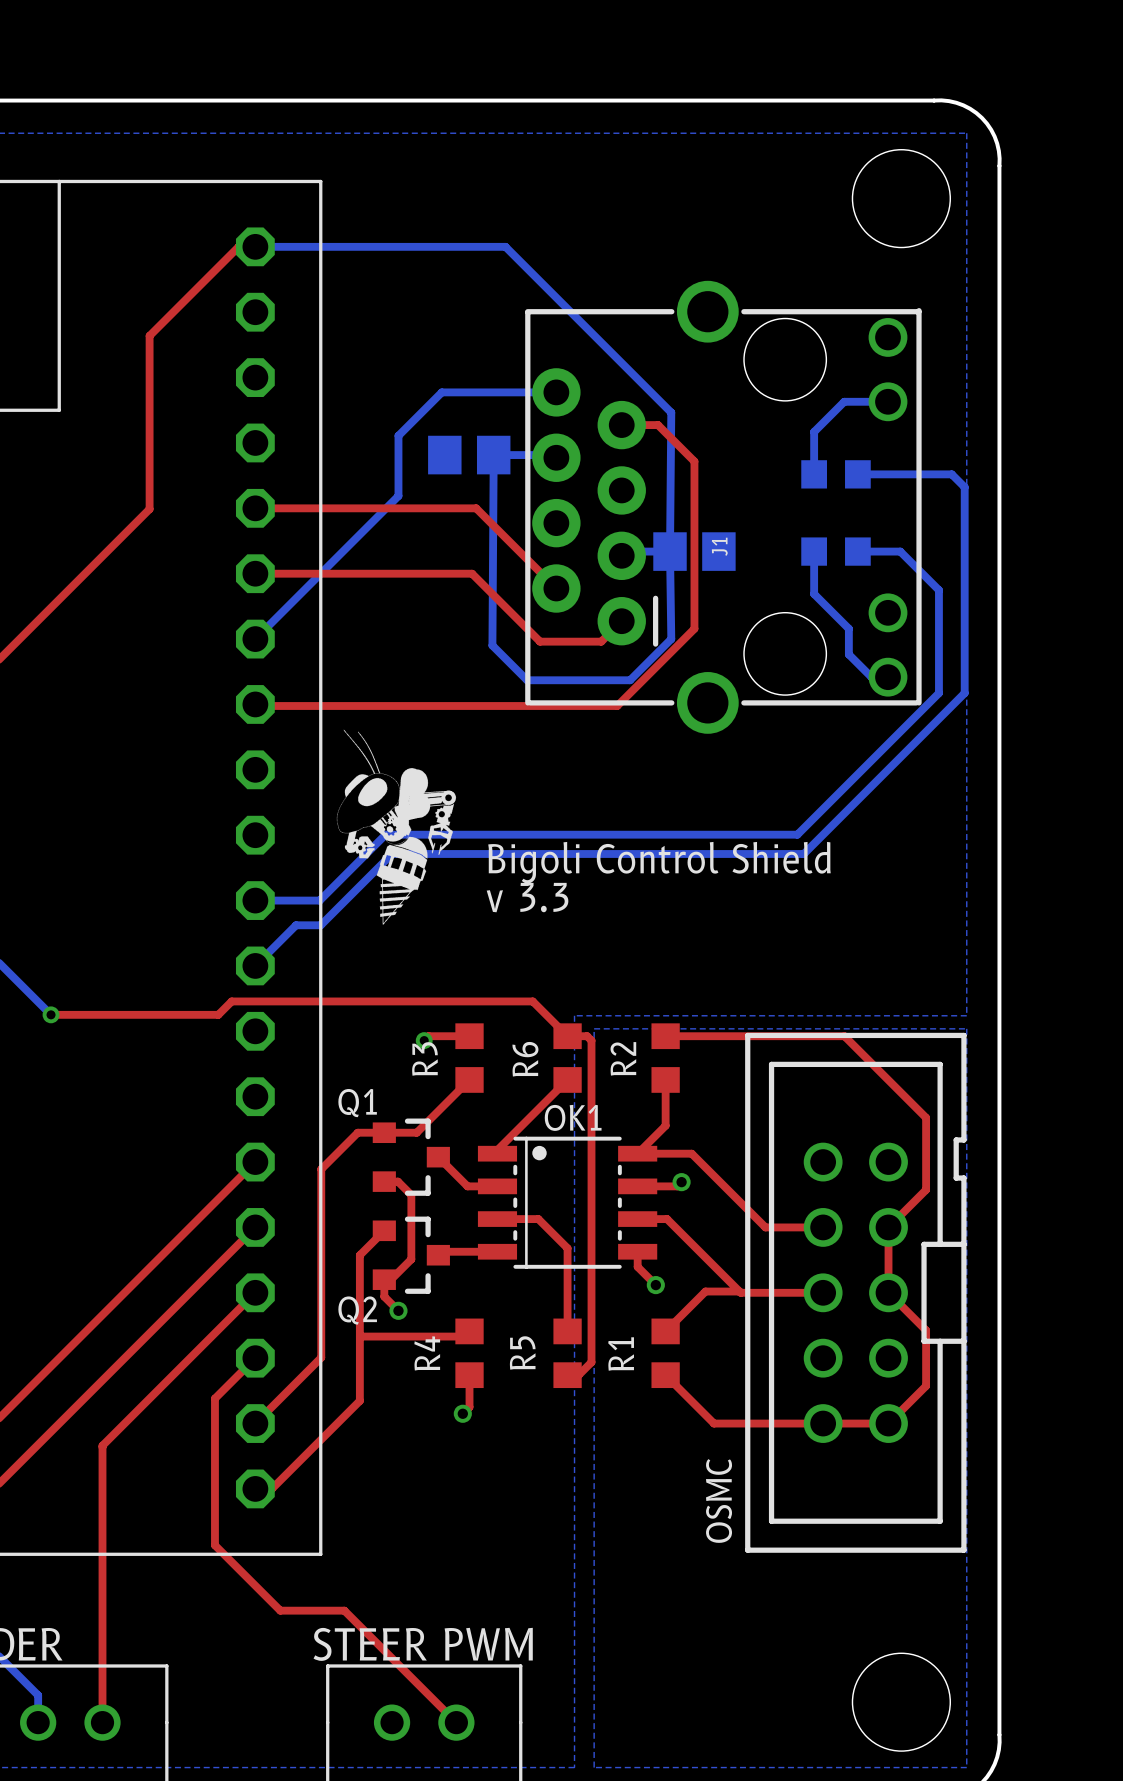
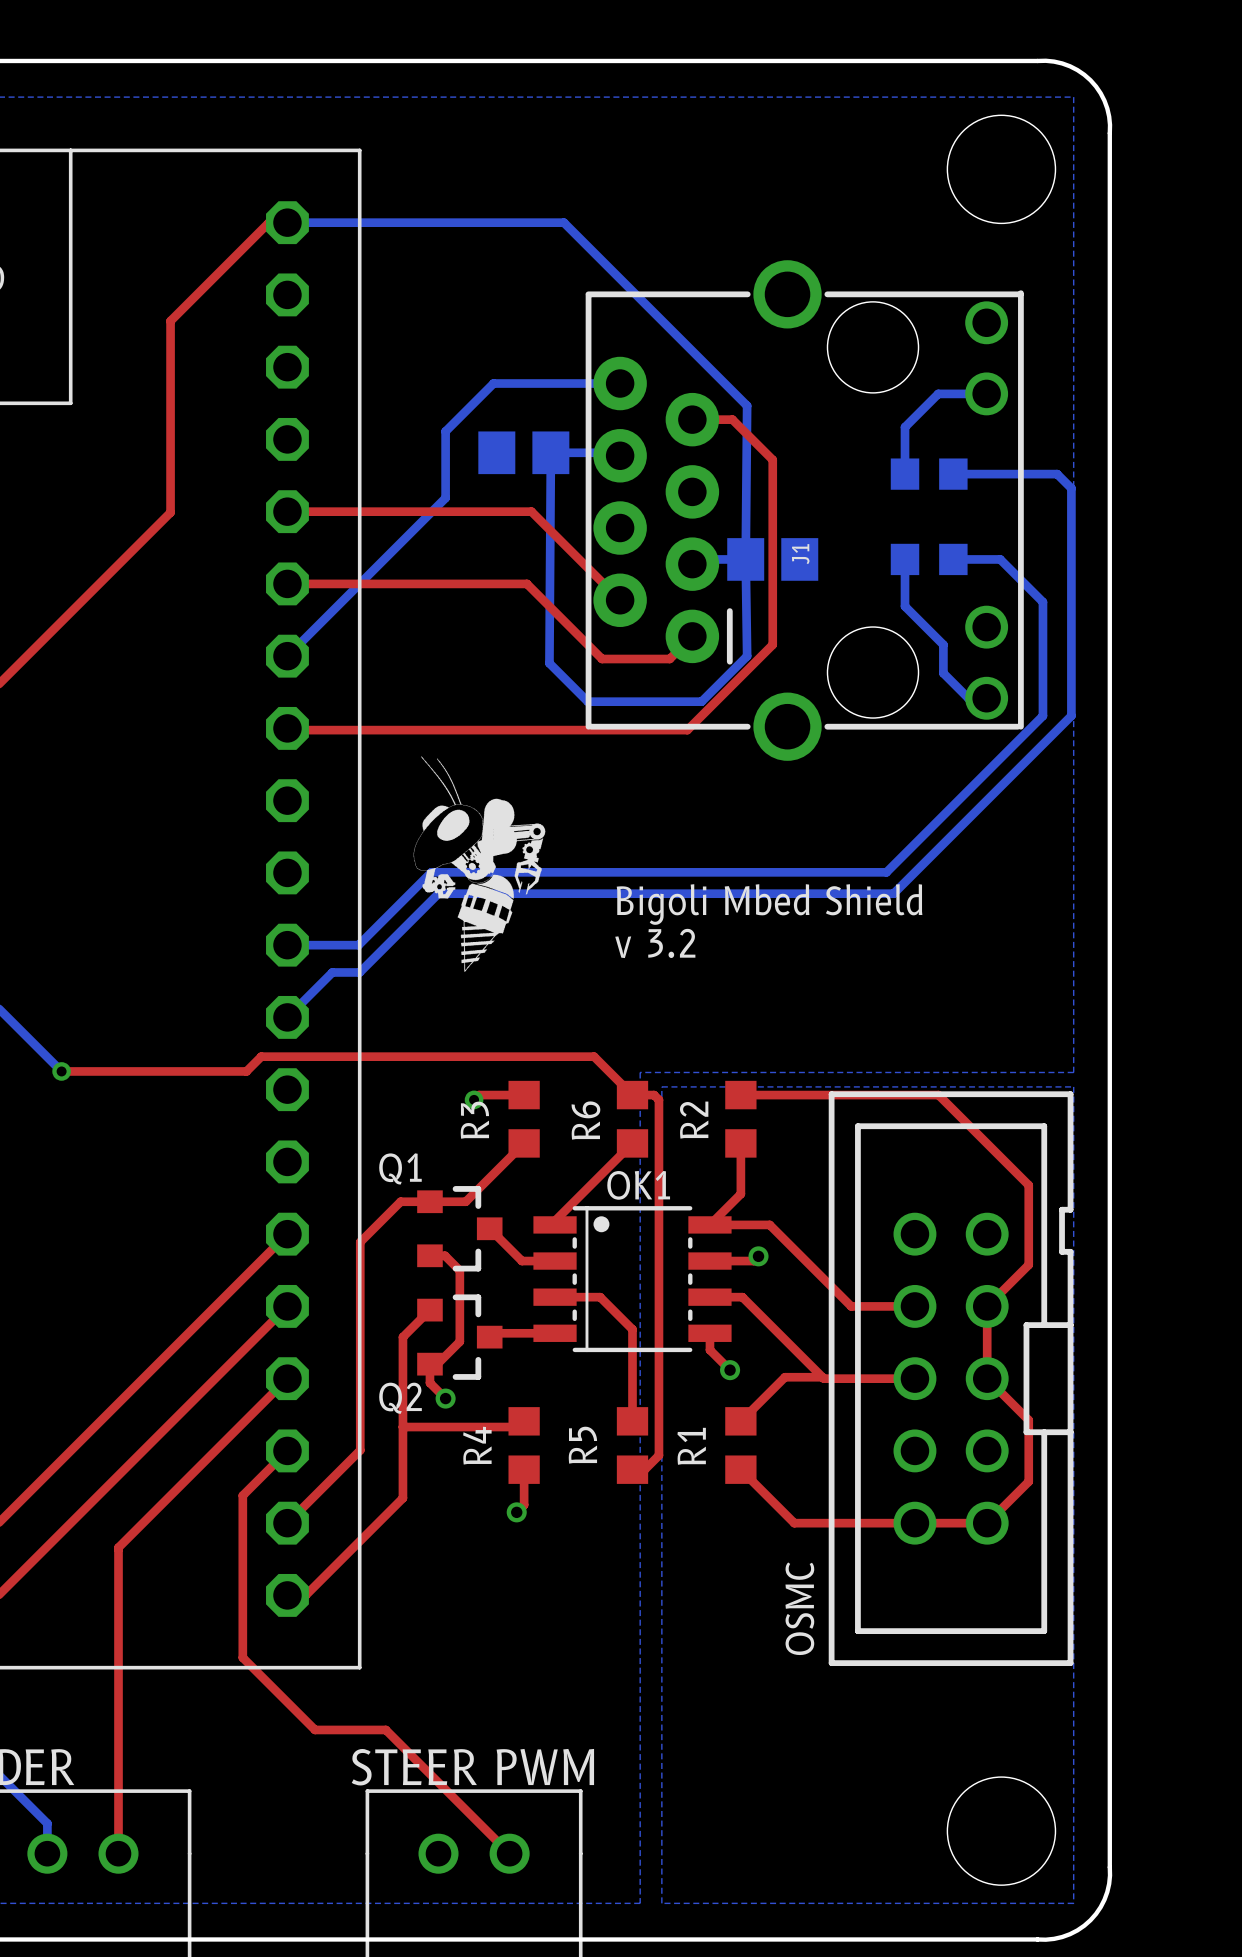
drawing position: (396, 827) -> (479, 863)
text: Bigoli Control Shield (659, 862) -> Bigoli Mbed Shield (769, 904)
text: v 3.3 (527, 897) -> v 3.2 (655, 943)

